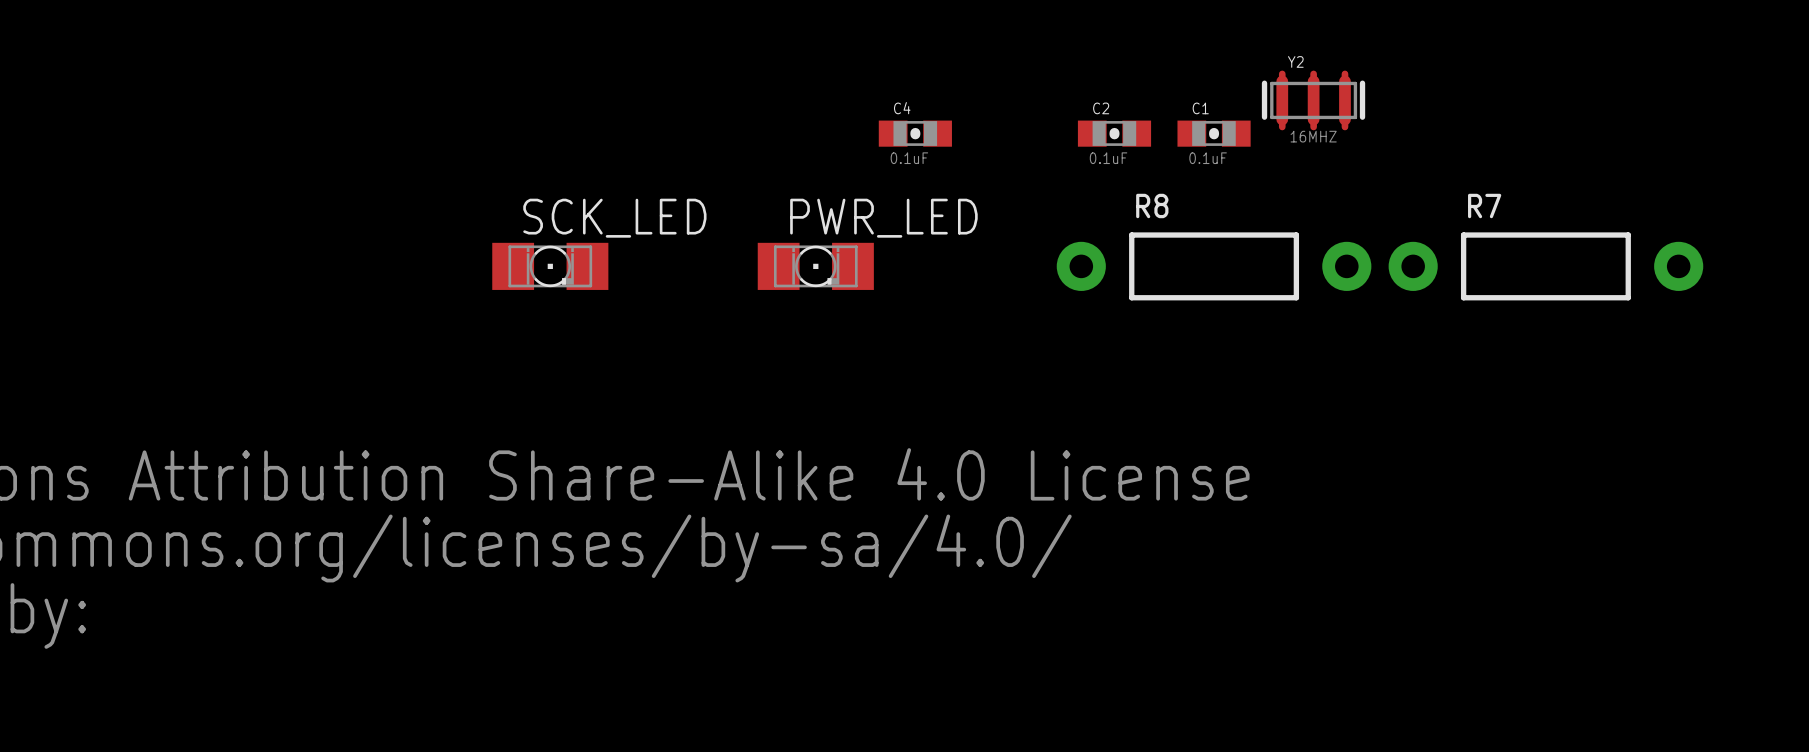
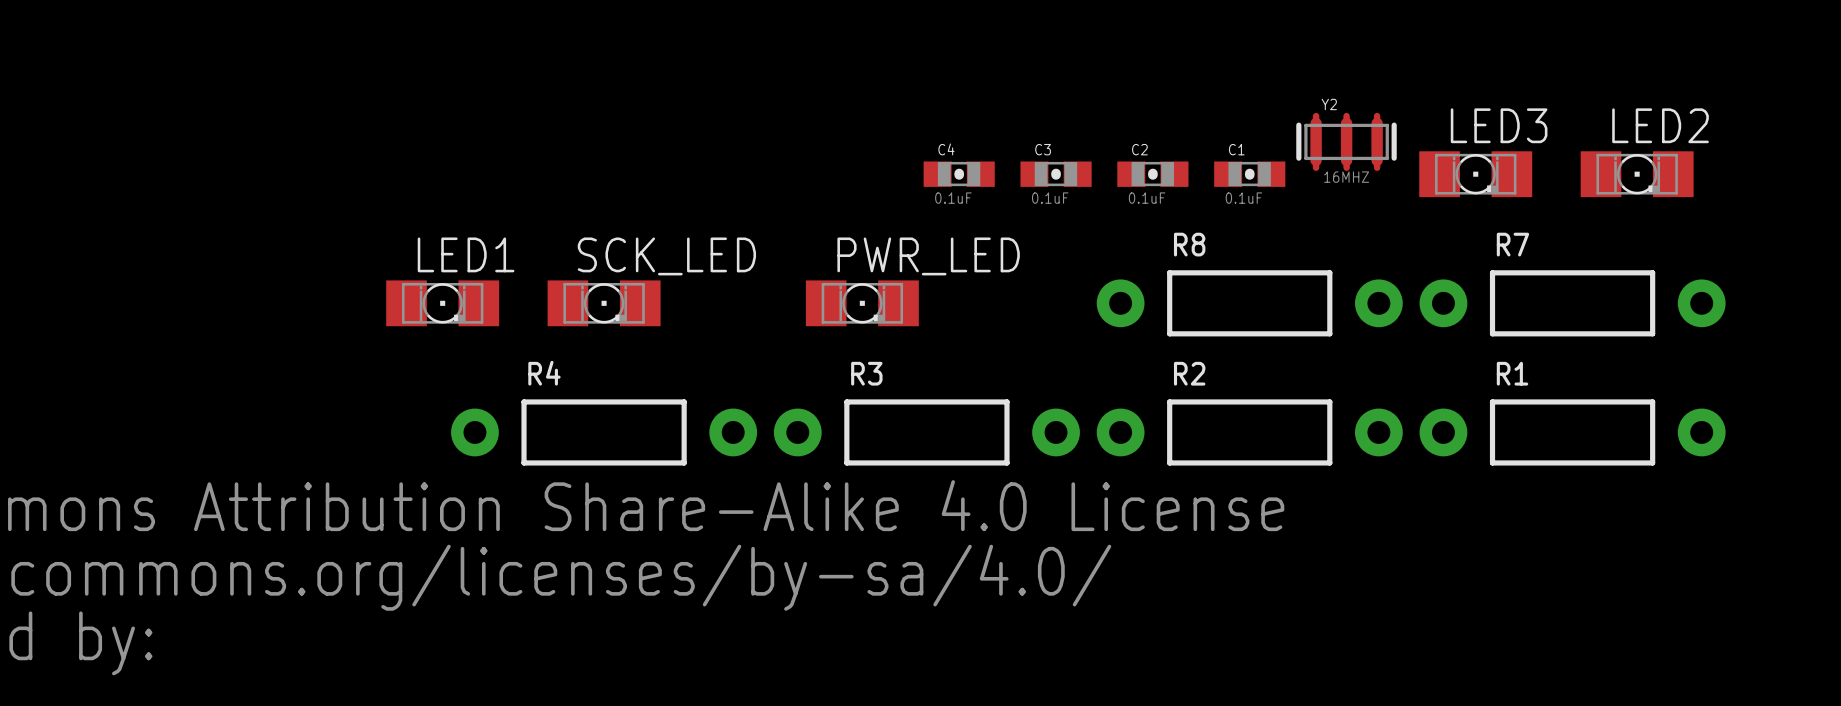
C3: none -> 0.1uF (1056, 174)
LED3: none -> (1475, 174)
LED2: none -> (1637, 174)
LED1: none -> (442, 303)
R4: none -> (604, 432)
R3: none -> (926, 432)
R2: none -> (1249, 432)
R1: none -> (1572, 432)

